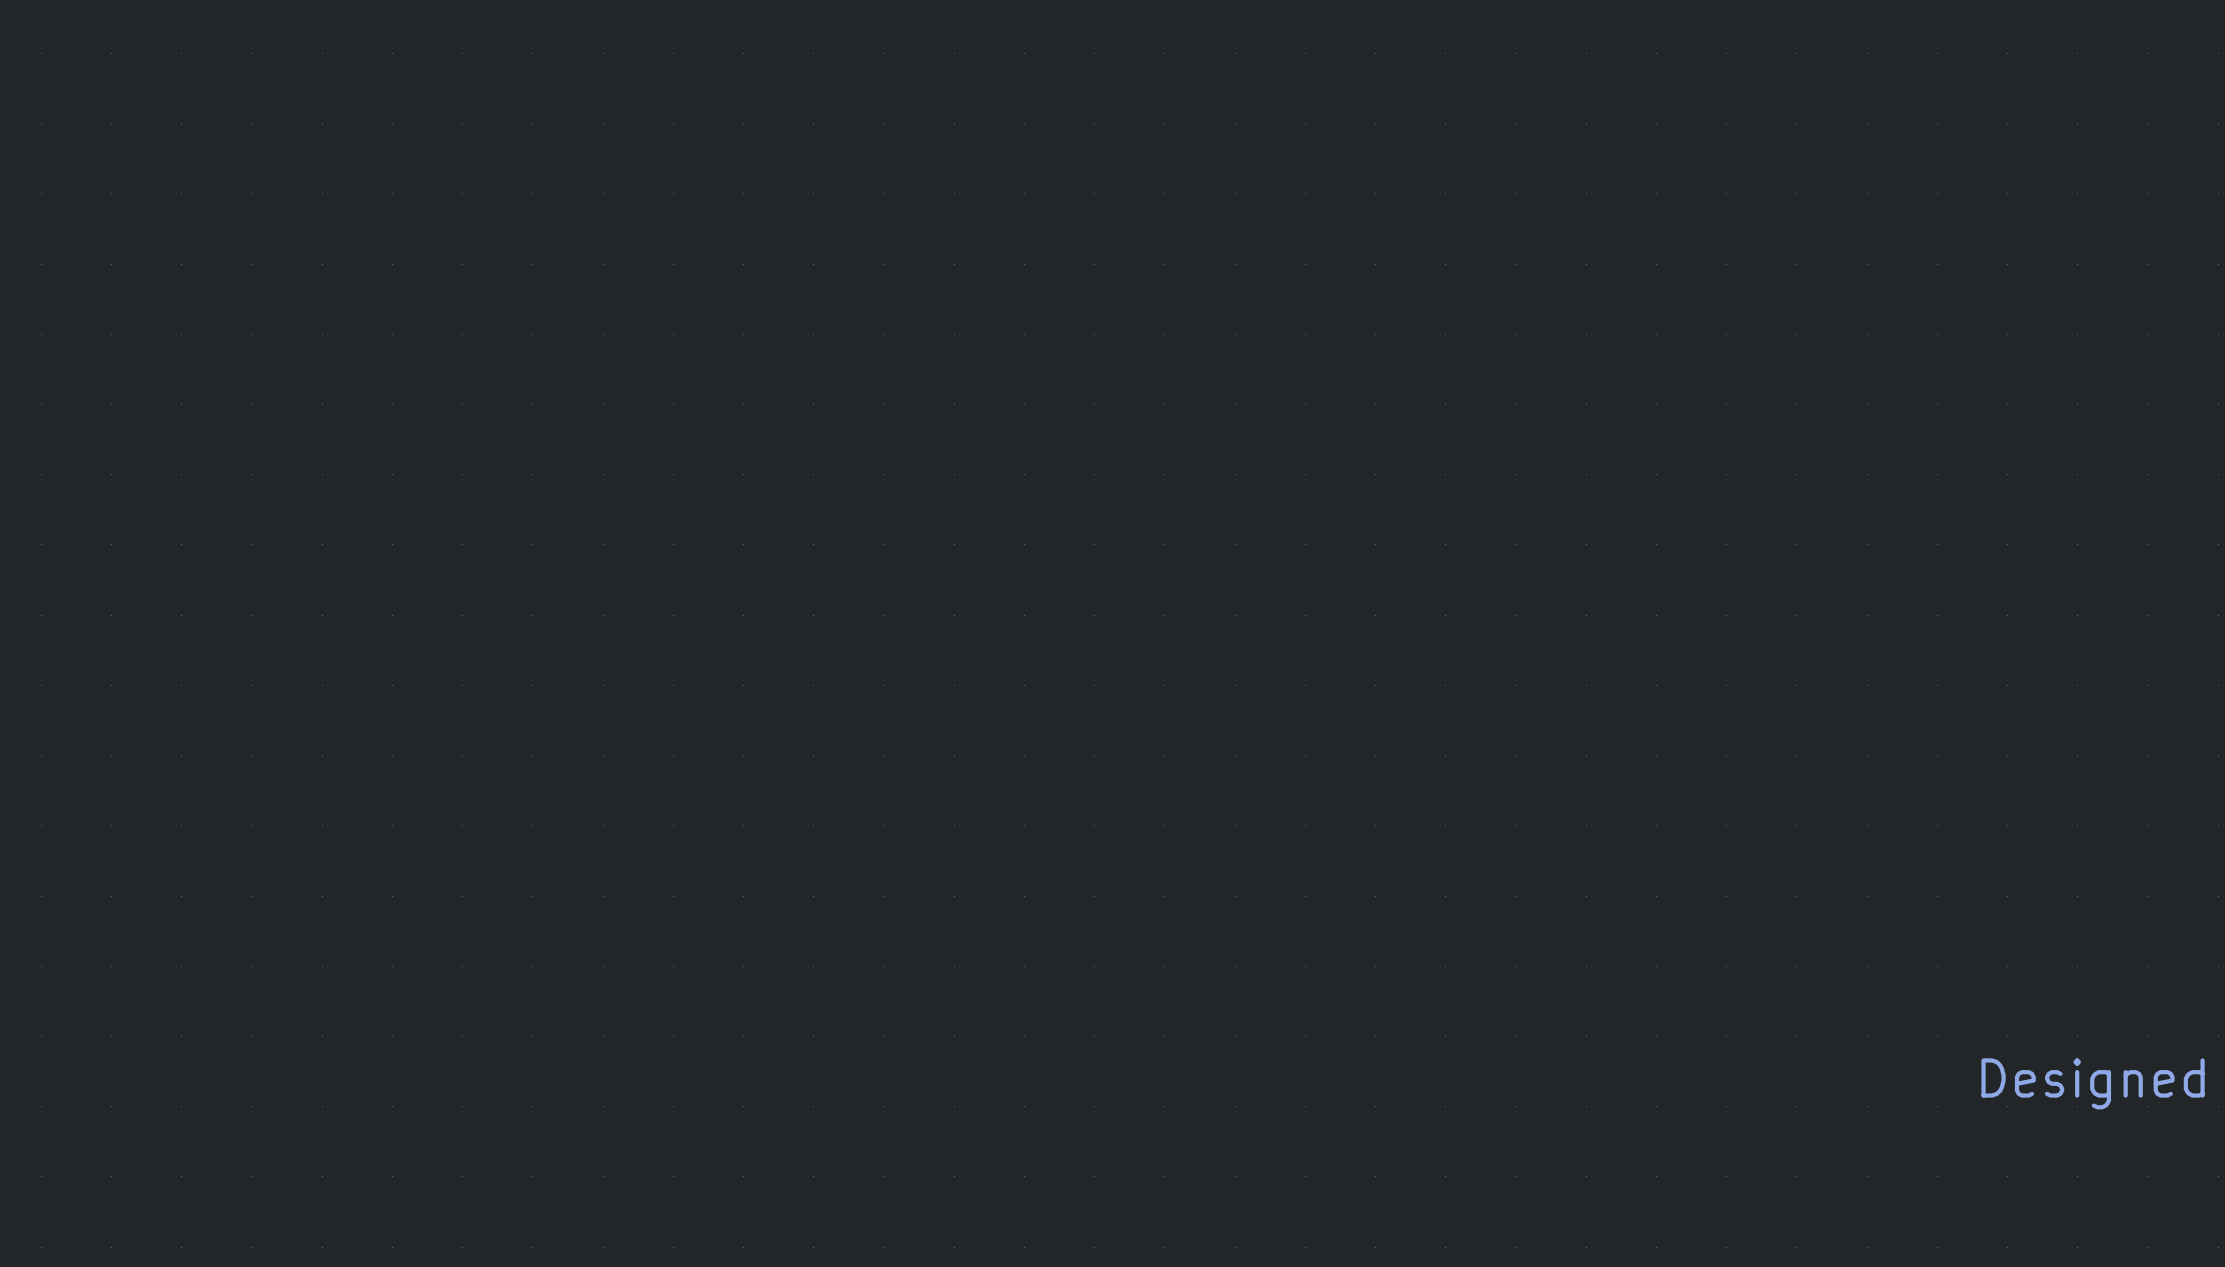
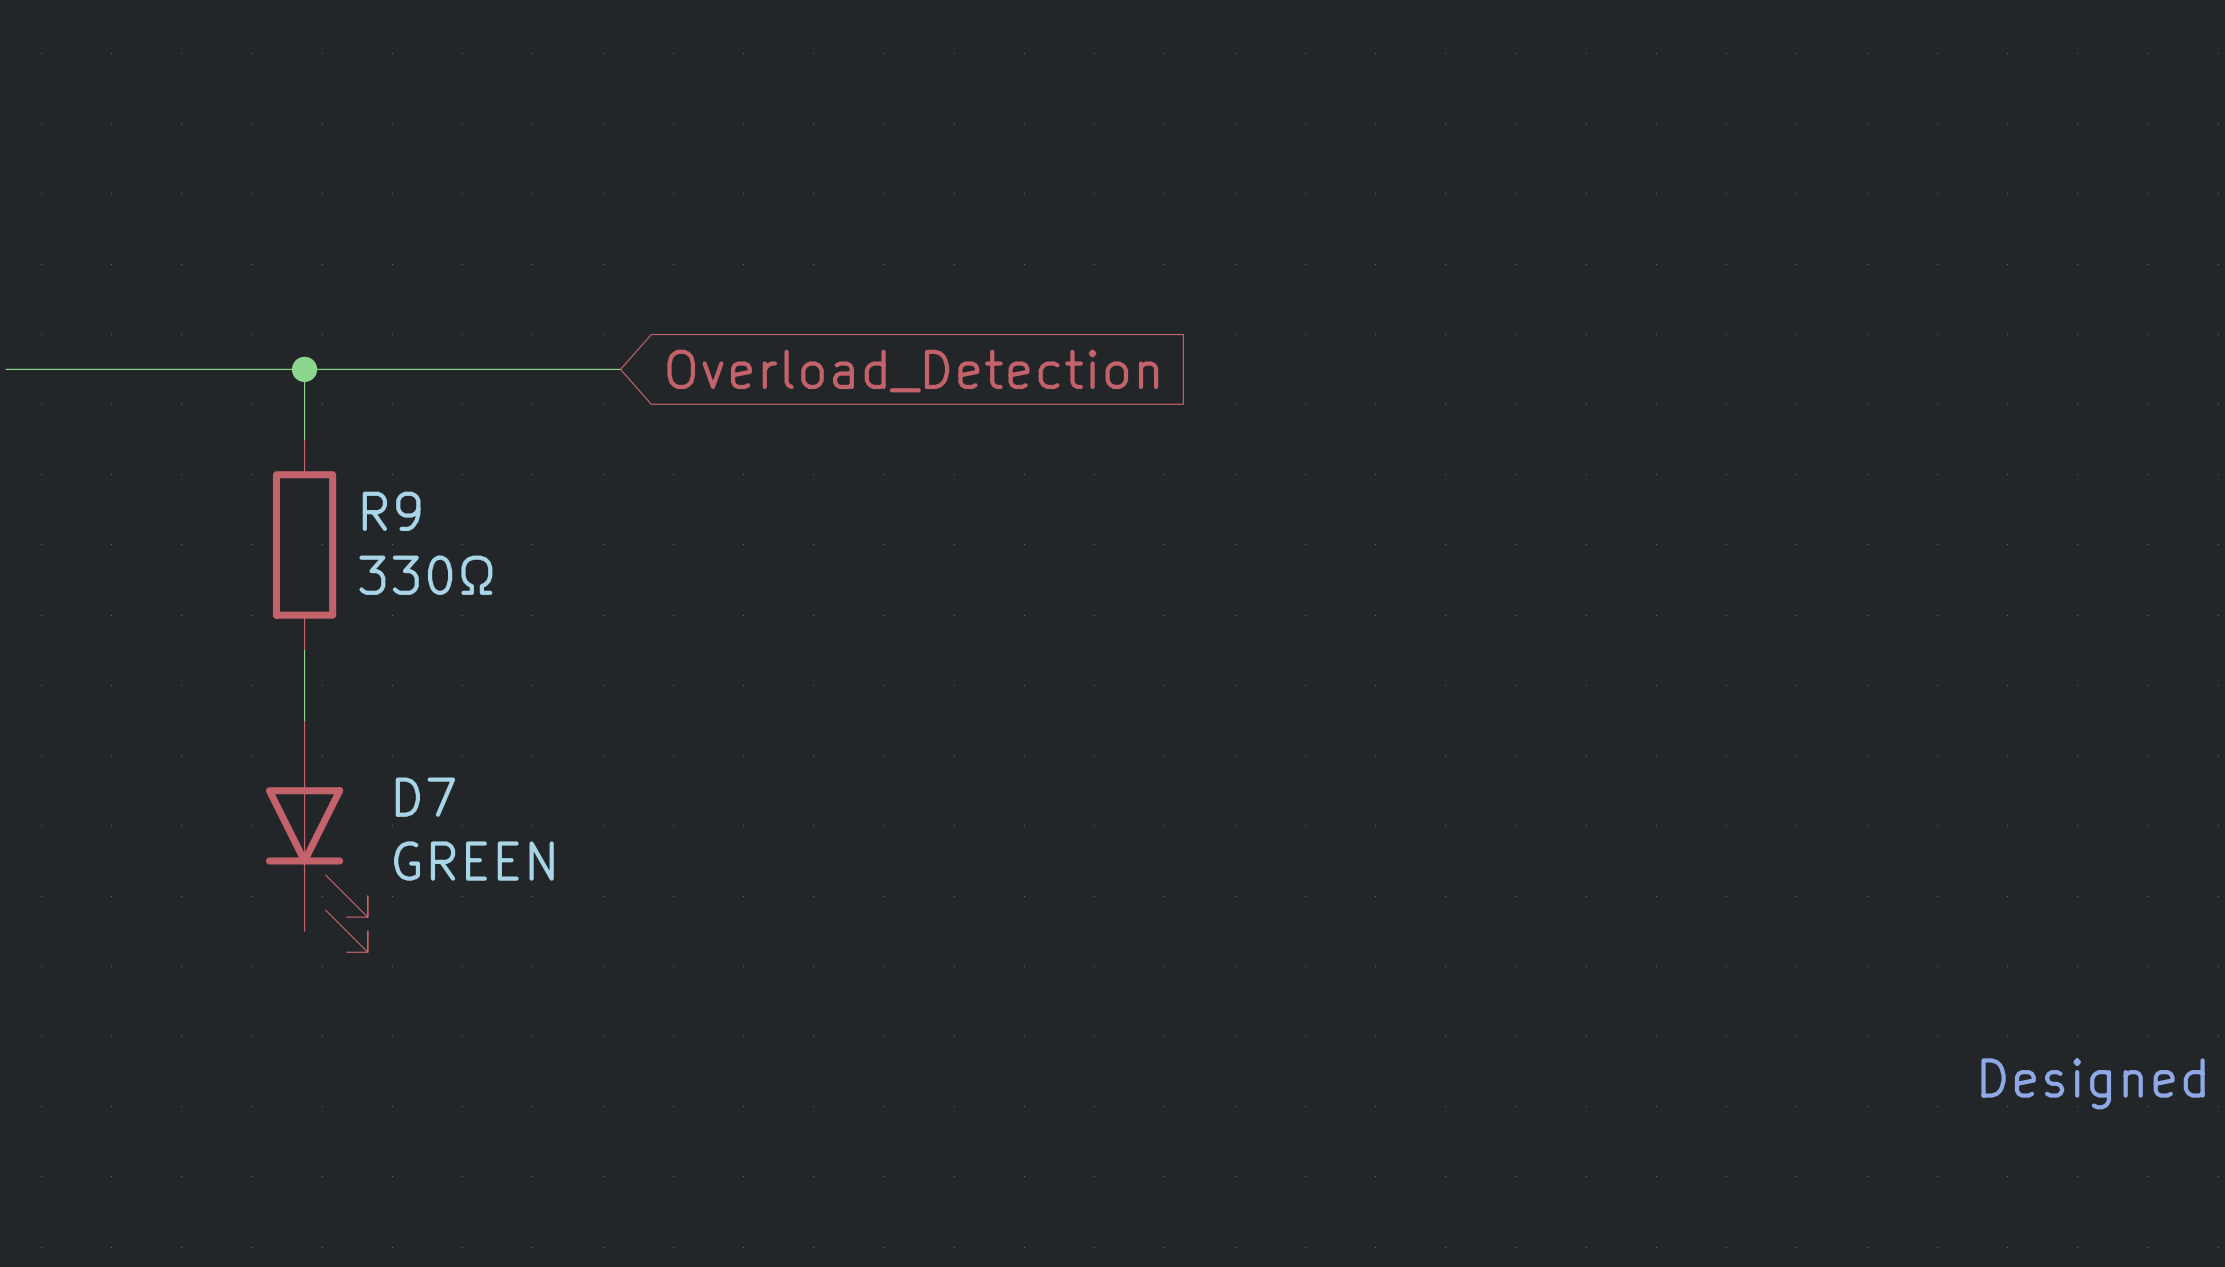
wire: none -> (6, 369) (620, 369)
wire: none -> (304, 369) (304, 439)
junction: none -> (304, 369)
global label: none -> Overload_Detection (912, 371)
R9: none -> 330Ω (304, 544)
wire: none -> (304, 650) (304, 720)
D7: none -> GREEN (316, 836)

